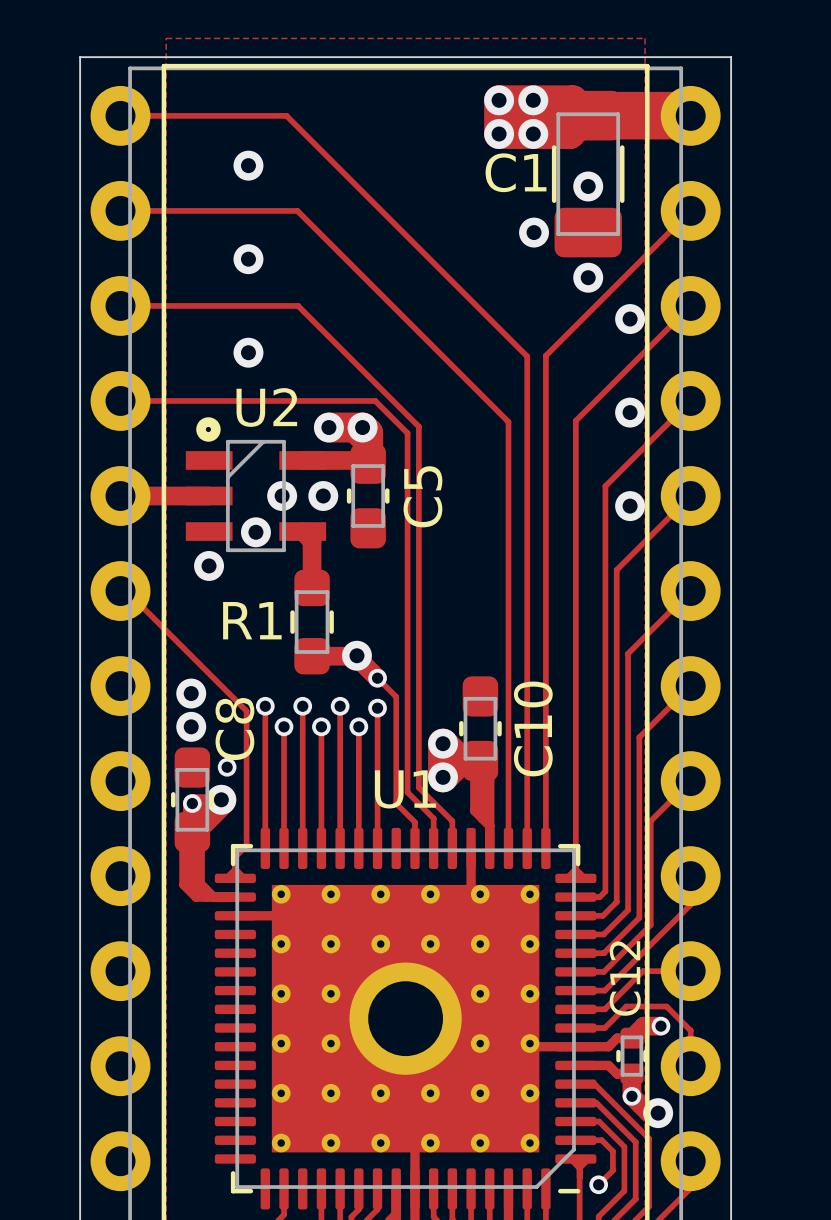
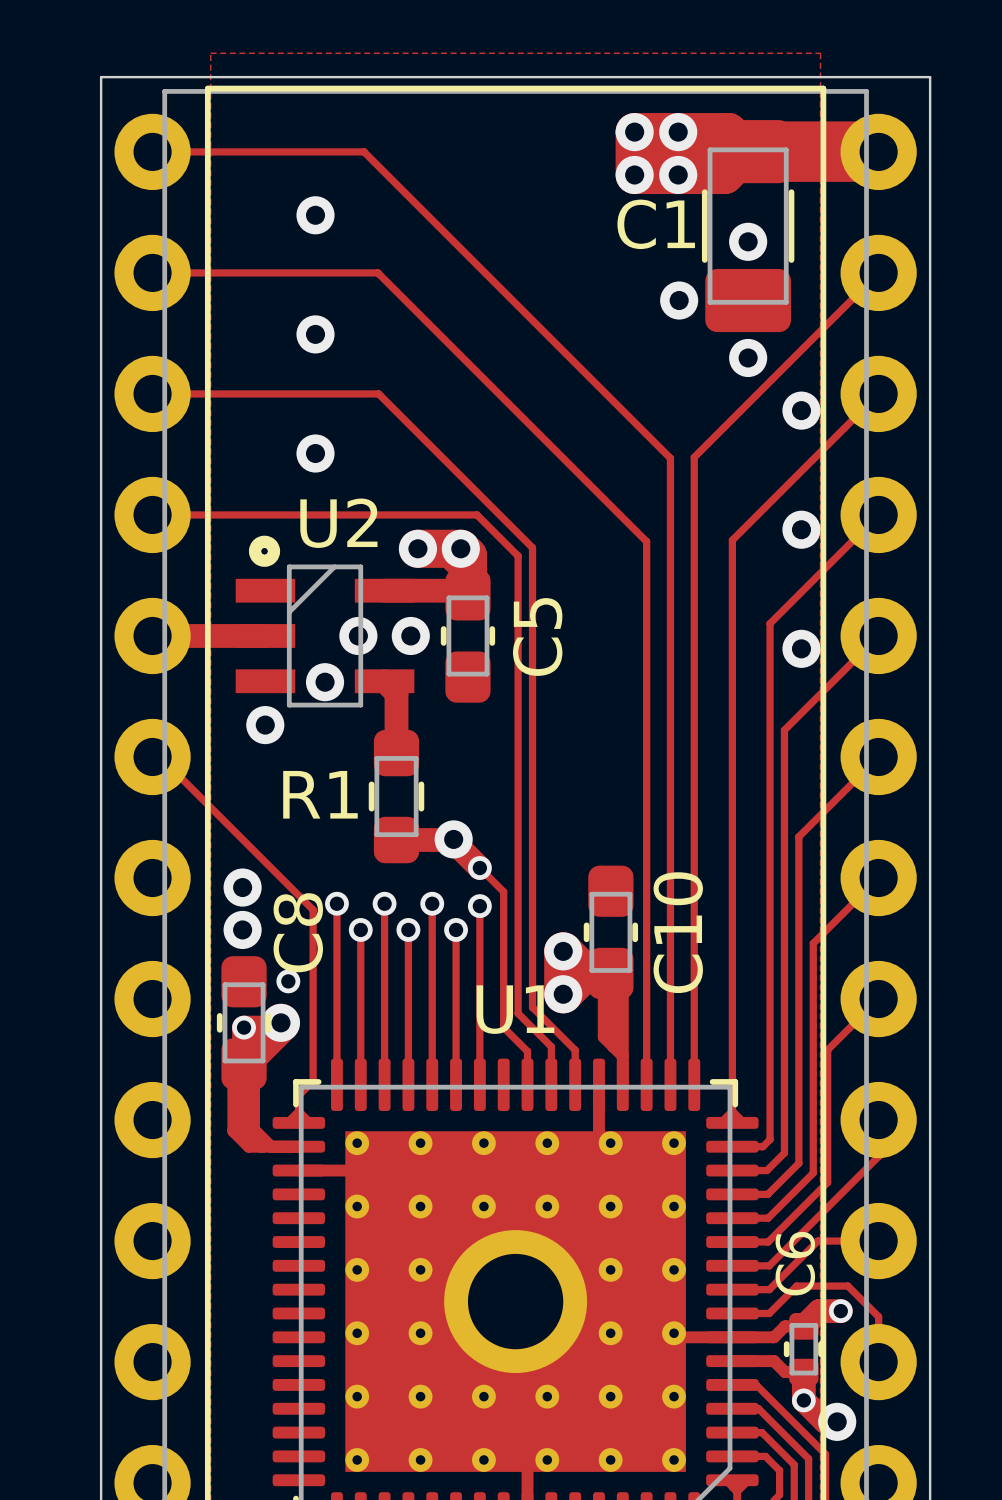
C12 name: C12 (625, 978) -> C6 (795, 1263)

